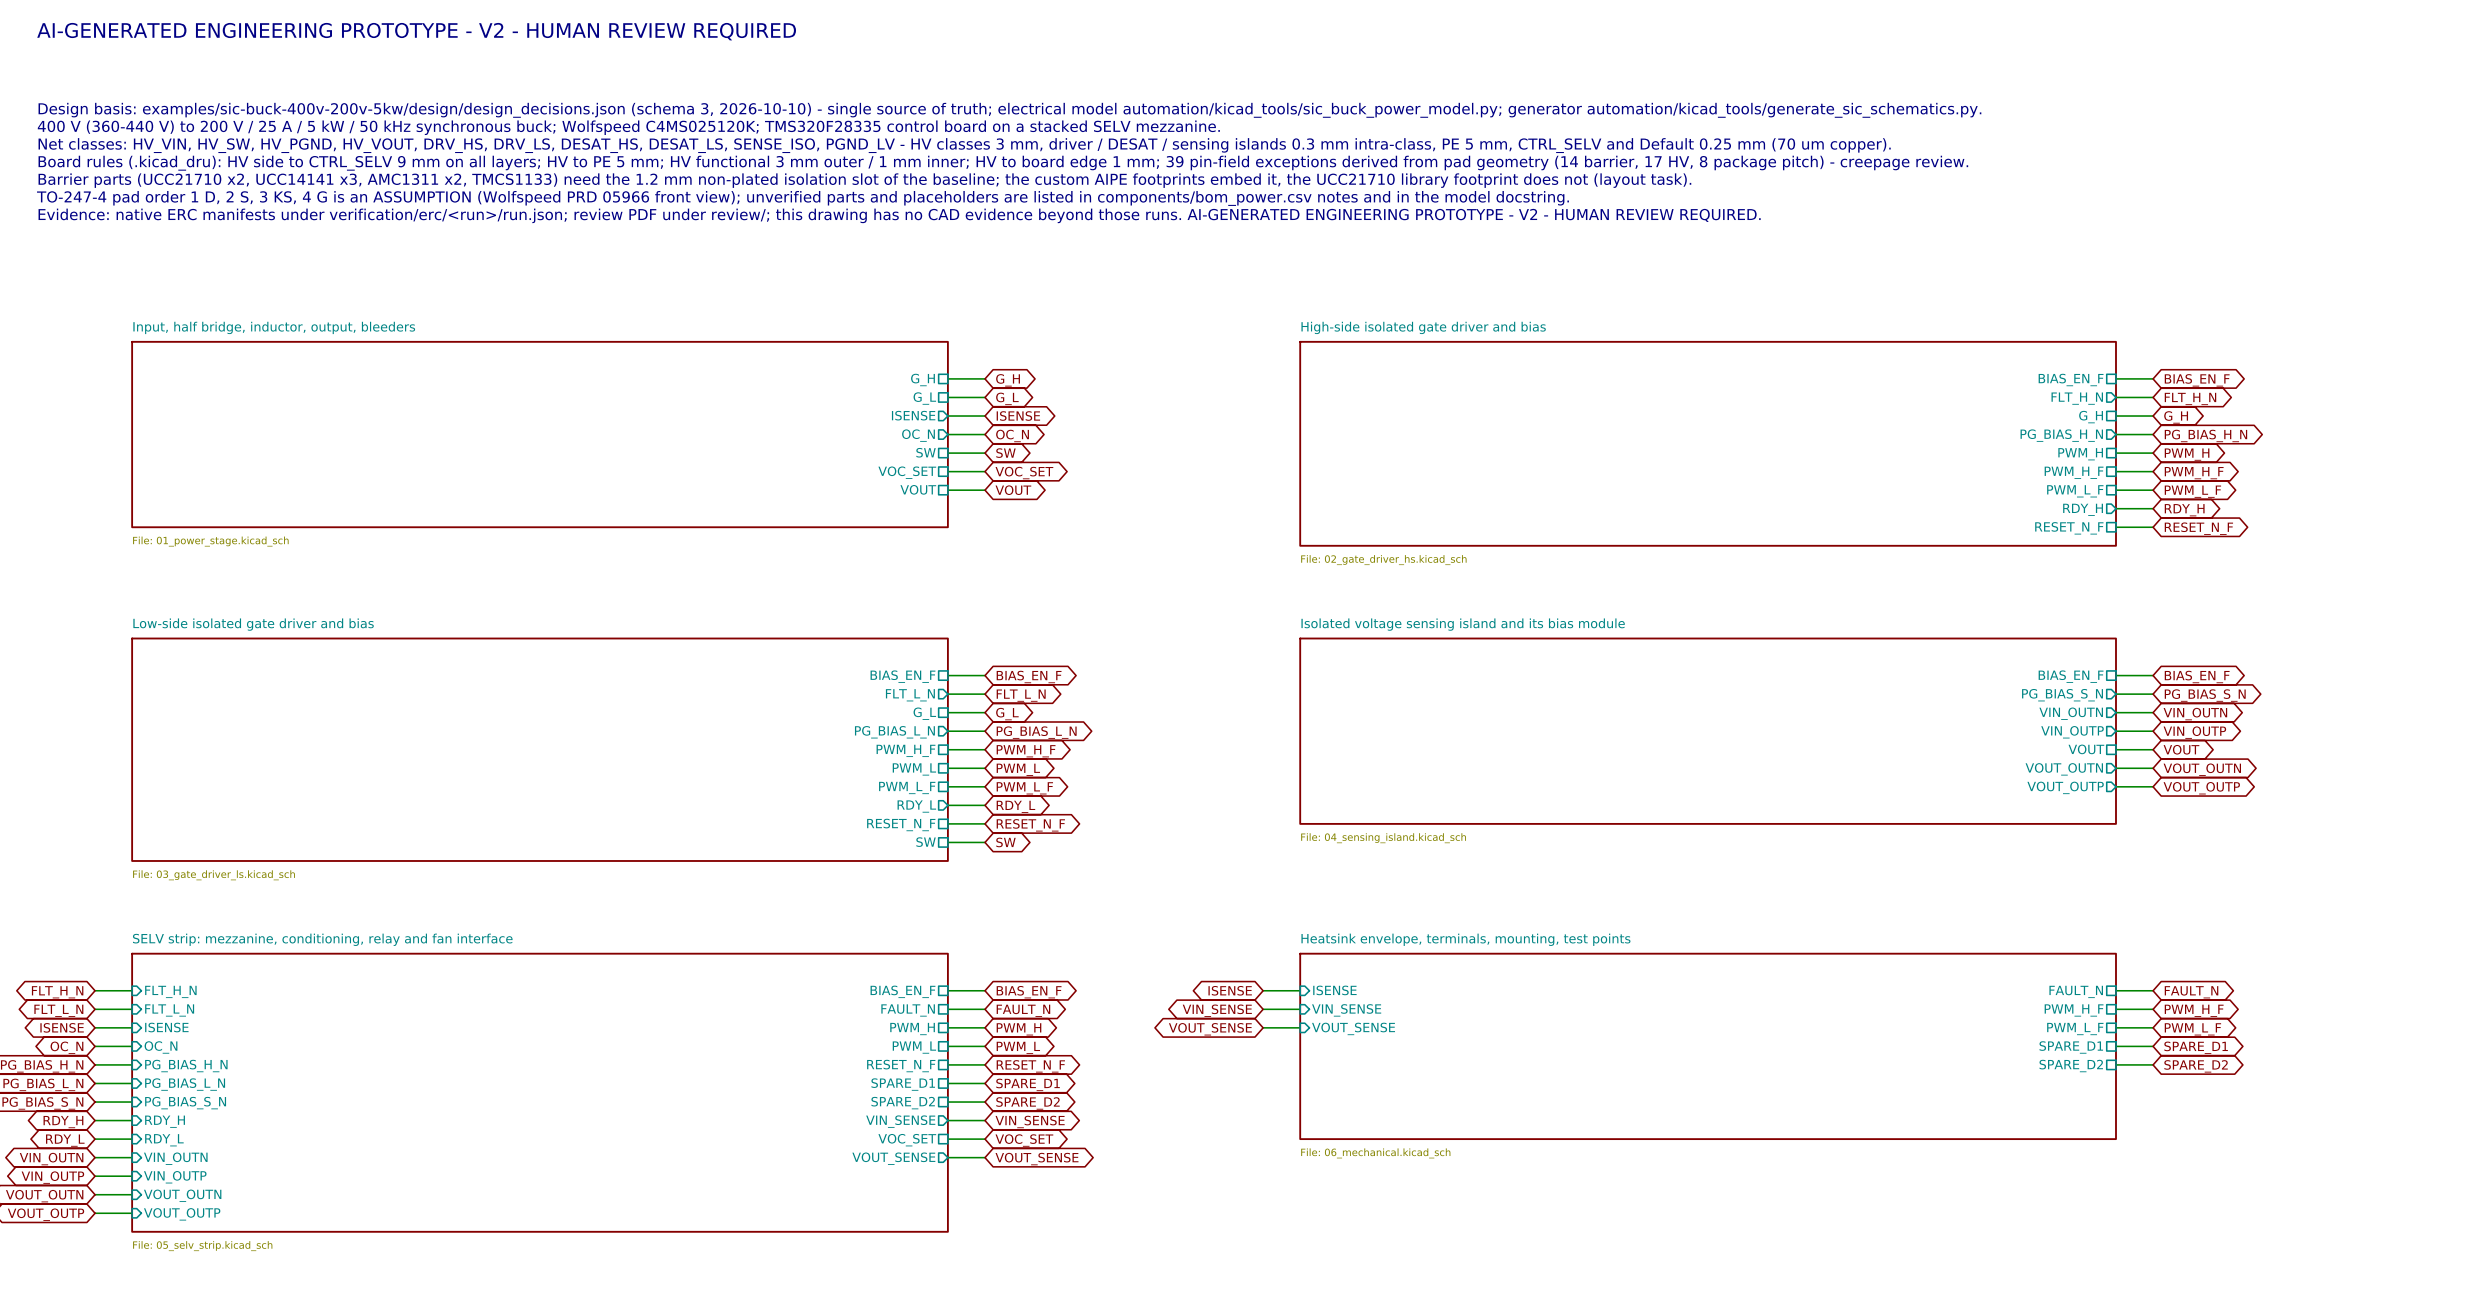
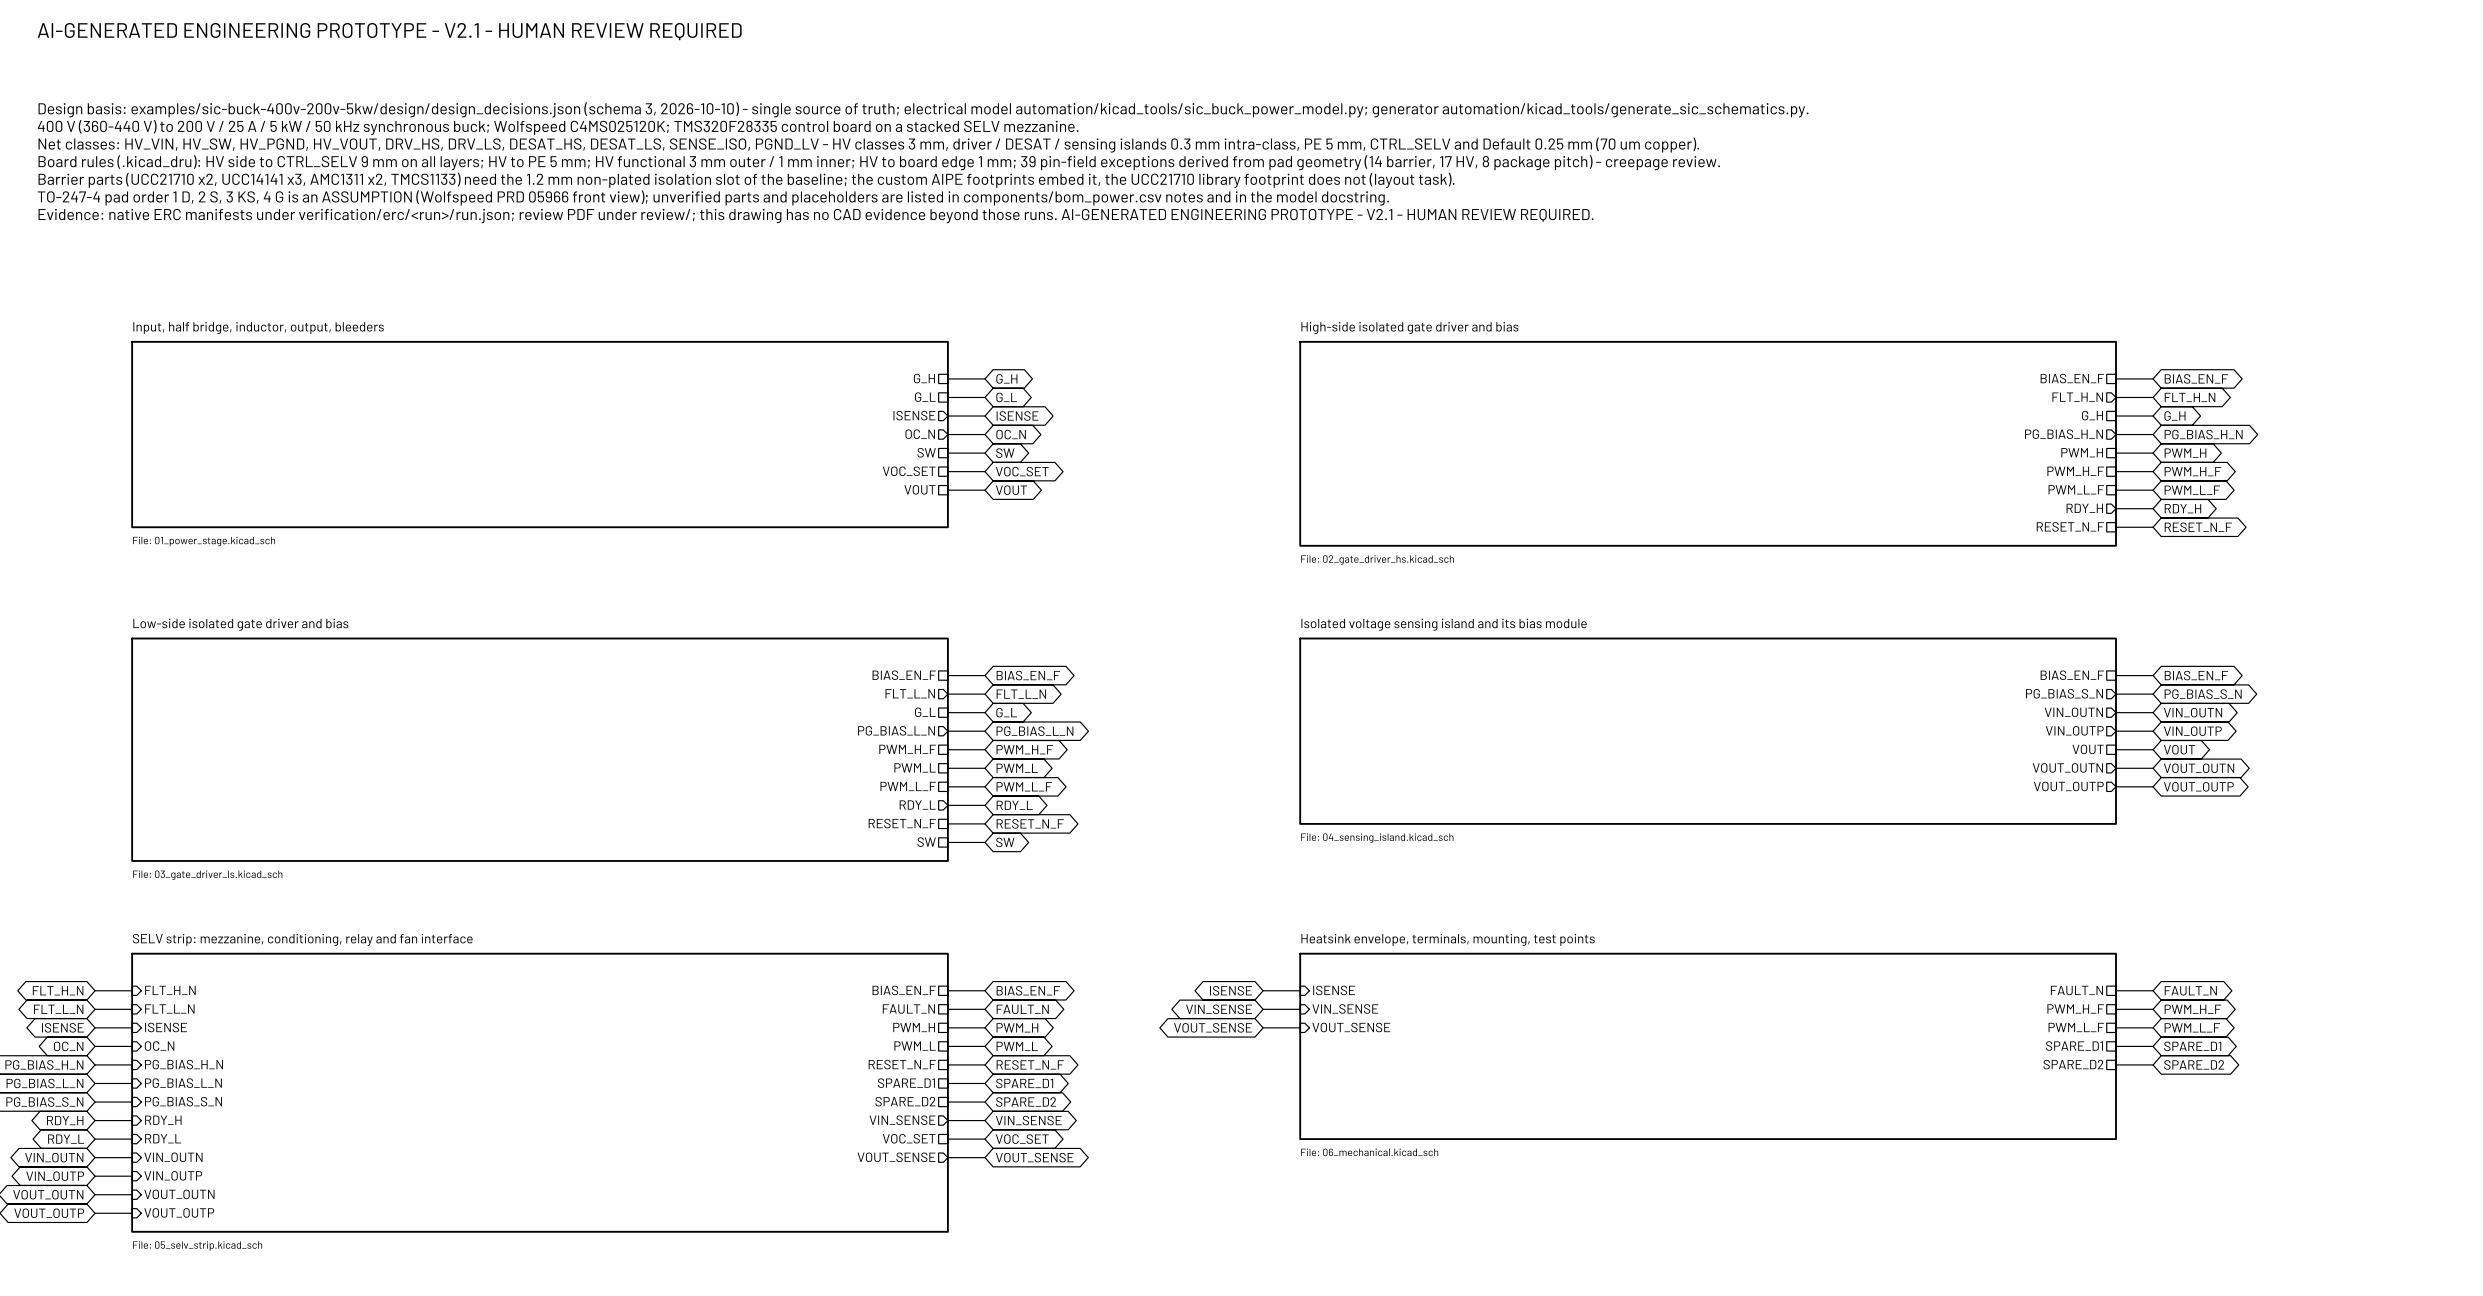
text: AI-GENERATED ENGINEERING PROTOTYPE - V2 - HUMAN REVIEW REQUIRED (416, 31) -> AI-GENERATED ENGINEERING PROTOTYPE - V2.1 - HUMAN REVIEW REQUIRED (389, 31)
text: Evidence: native ERC manifests under verification/erc/<run>/run.json; review PDF under review/; this drawing has no CAD evidence beyond those runs. AI-GENERATED ENGINEERING PROTOTYPE - V2 - HUMAN REVIEW REQUIRED. (899, 215) -> Evidence: native ERC manifests under verification/erc/<run>/run.json; review PDF under review/; this drawing has no CAD evidence beyond those runs. AI-GENERATED ENGINEERING PROTOTYPE - V2.1 - HUMAN REVIEW REQUIRED. (816, 216)

